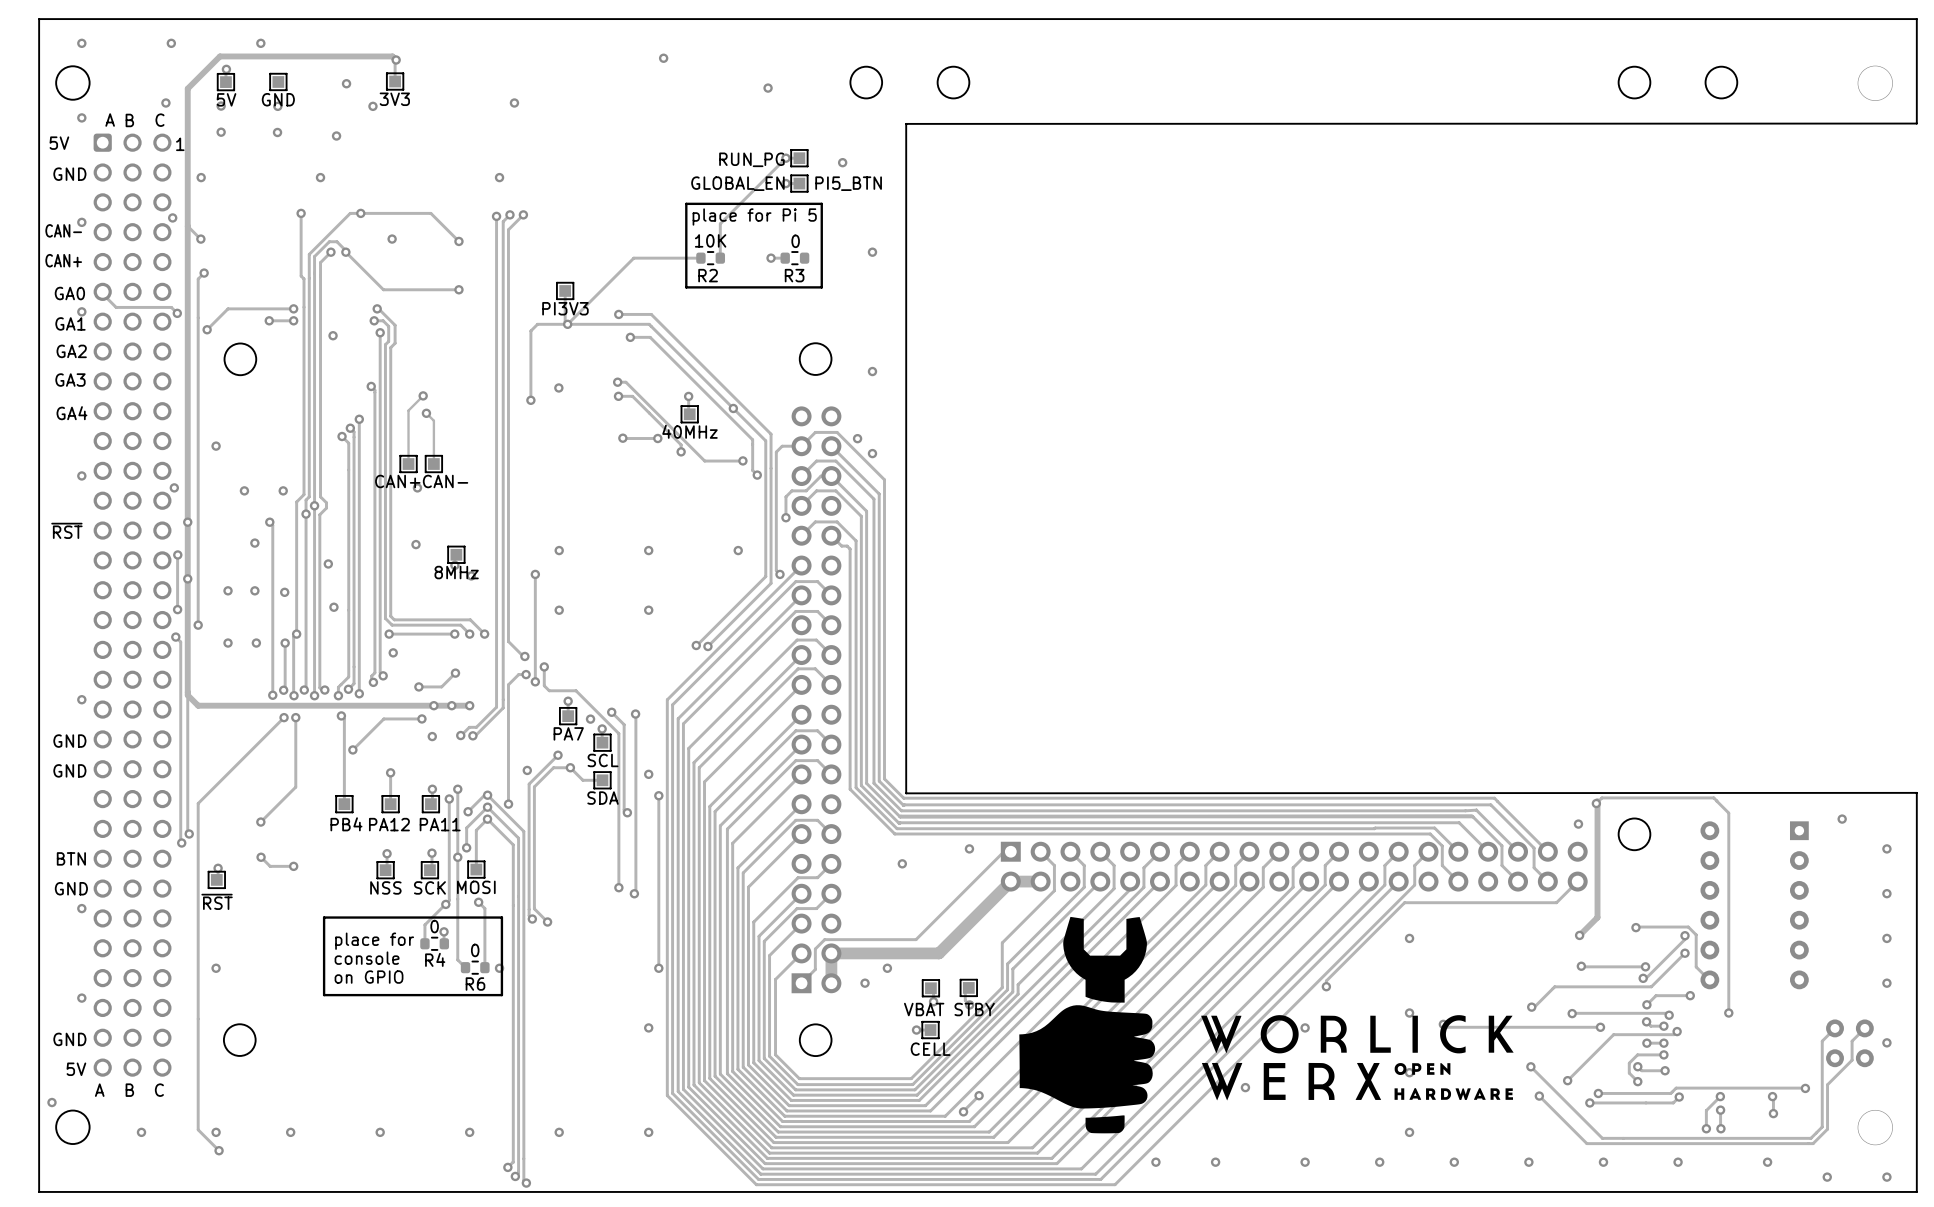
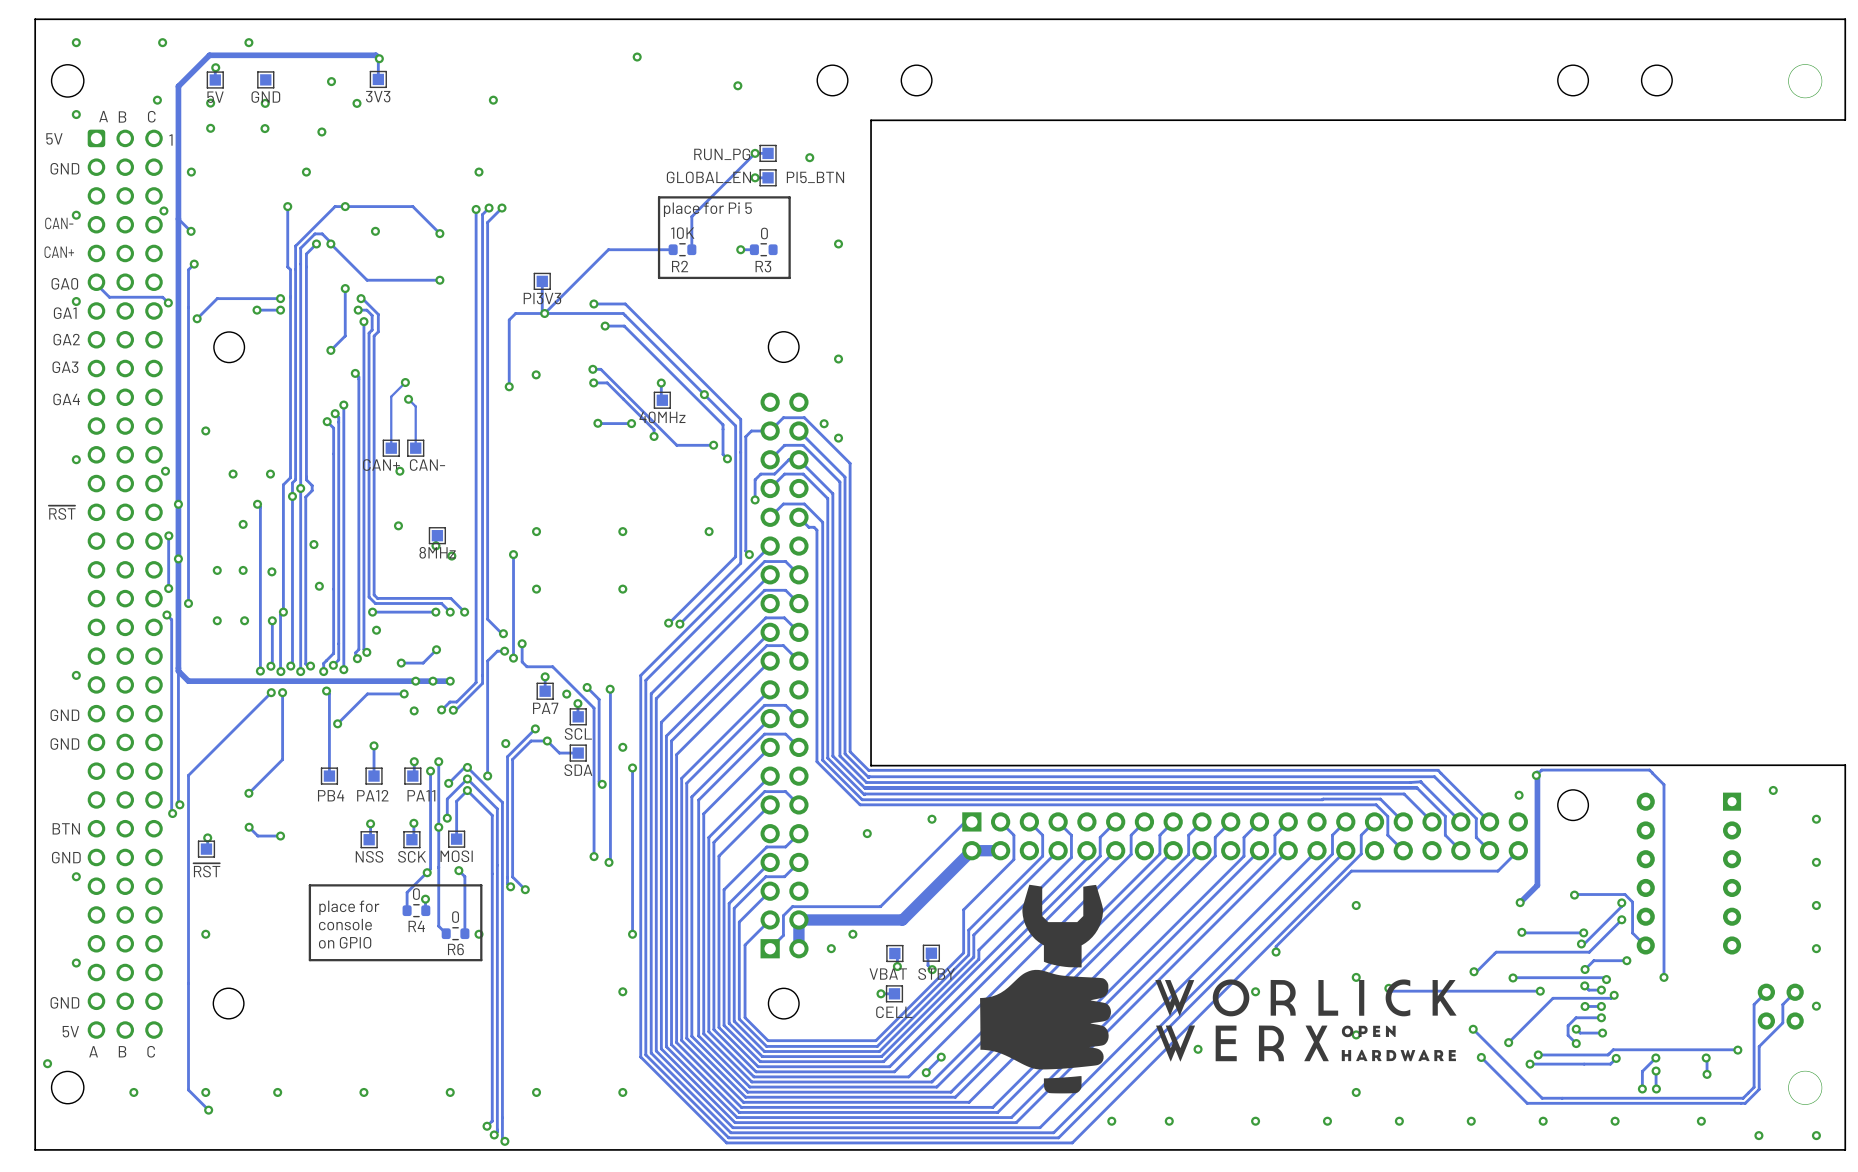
track: none -> (345, 288) (345, 336) (330, 350)
via: none -> (345, 288)
via: (333, 335) -> none
via: none -> (330, 350)

